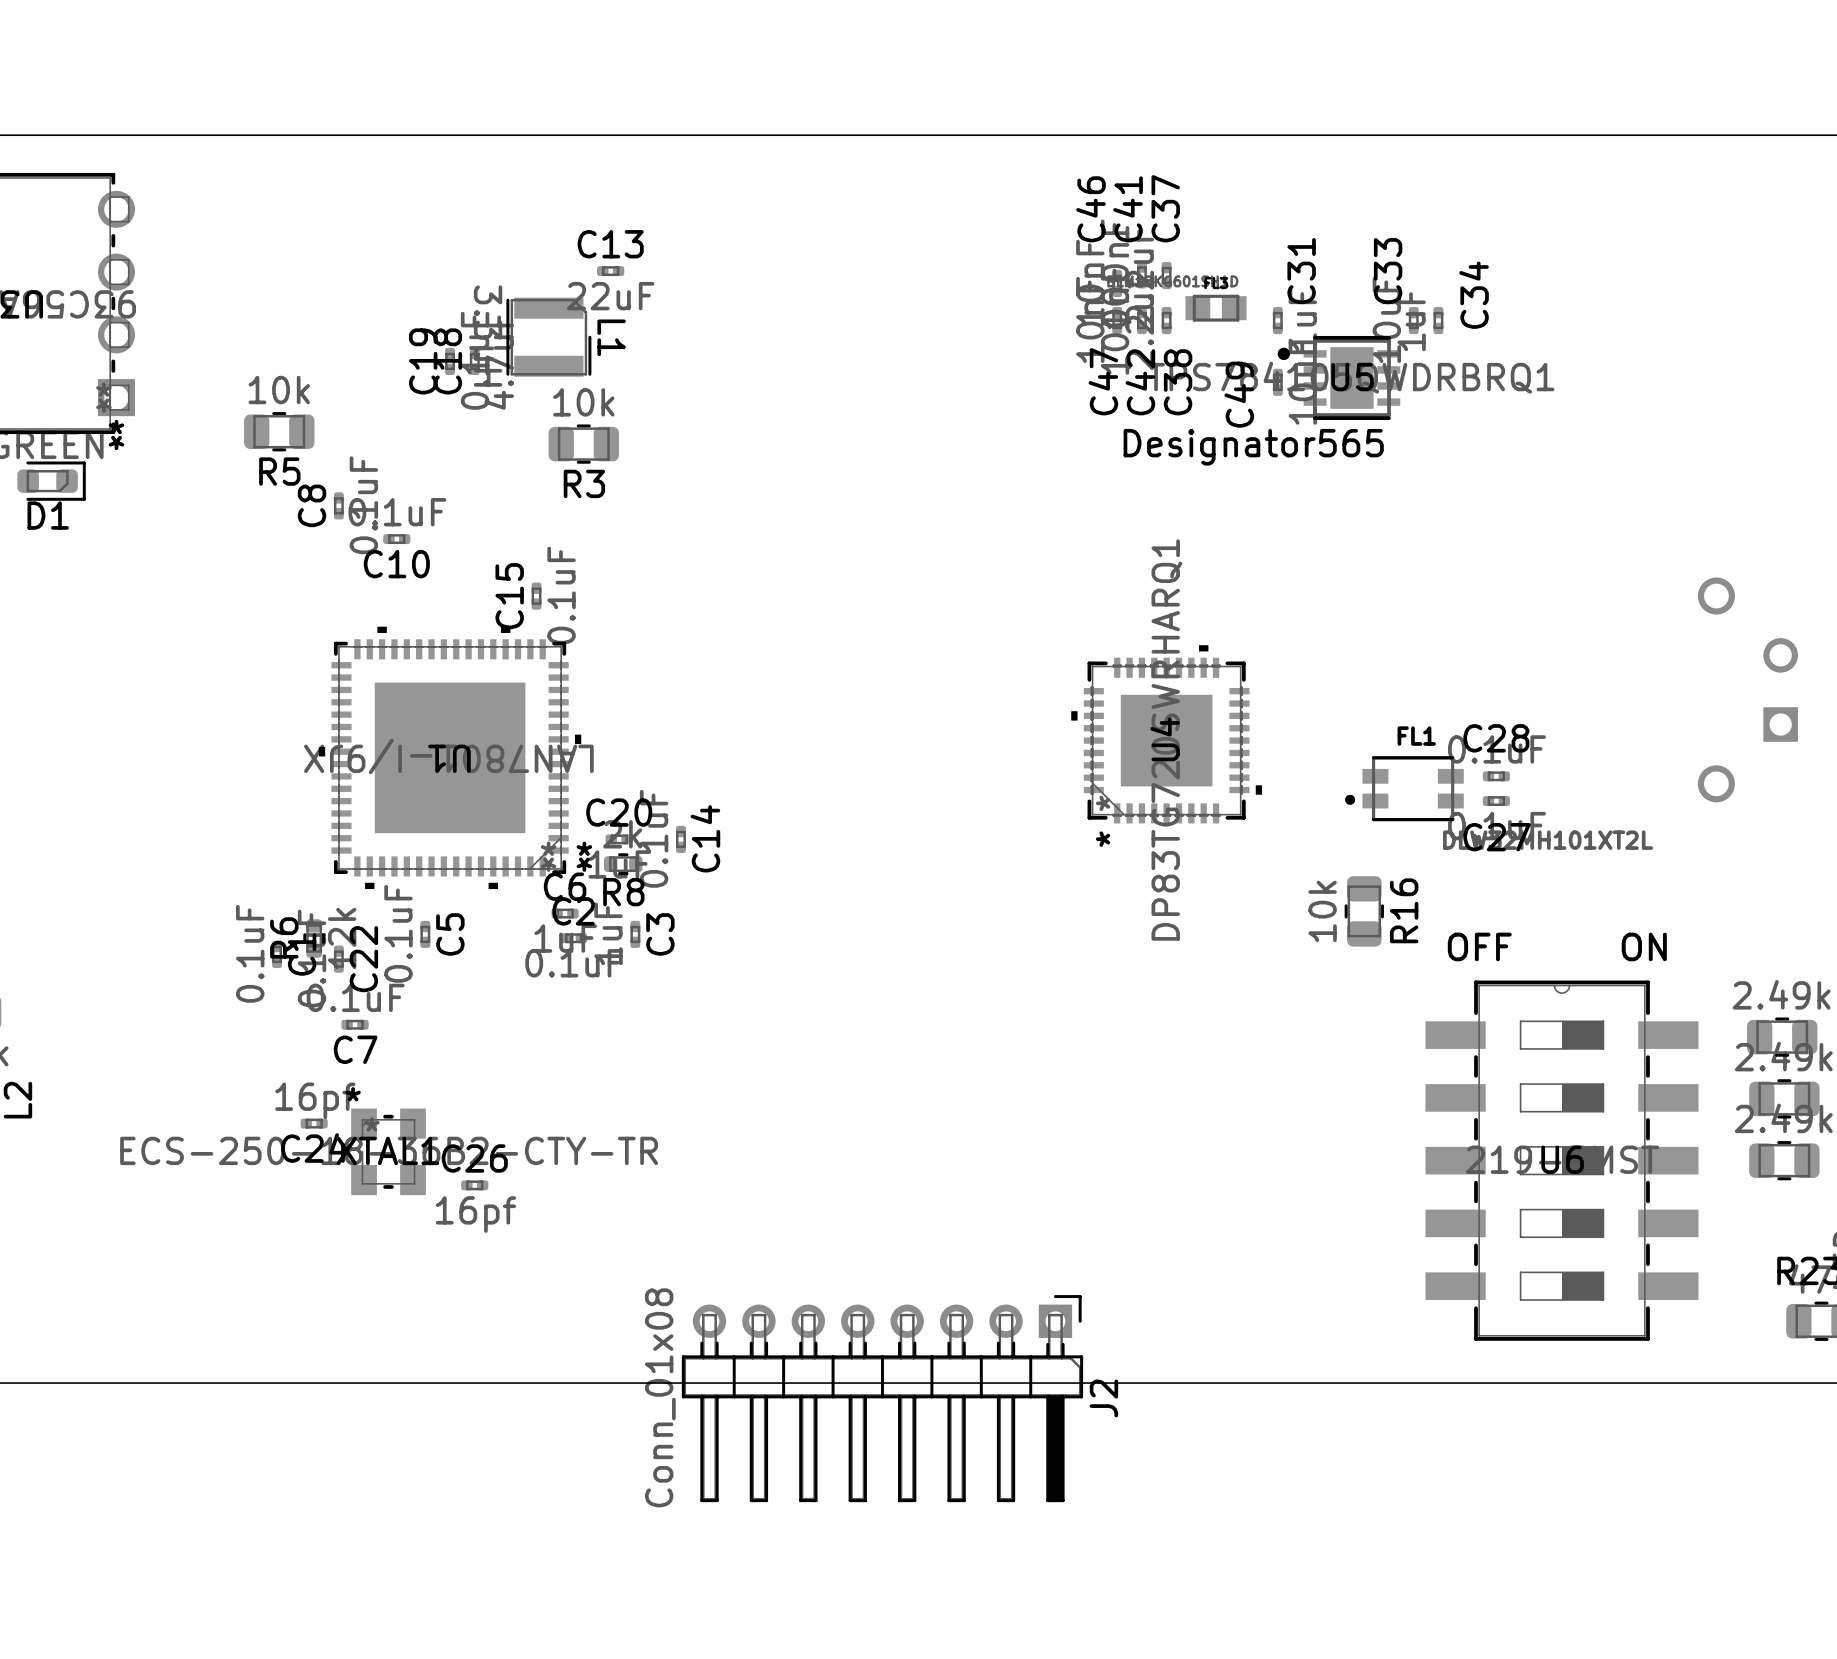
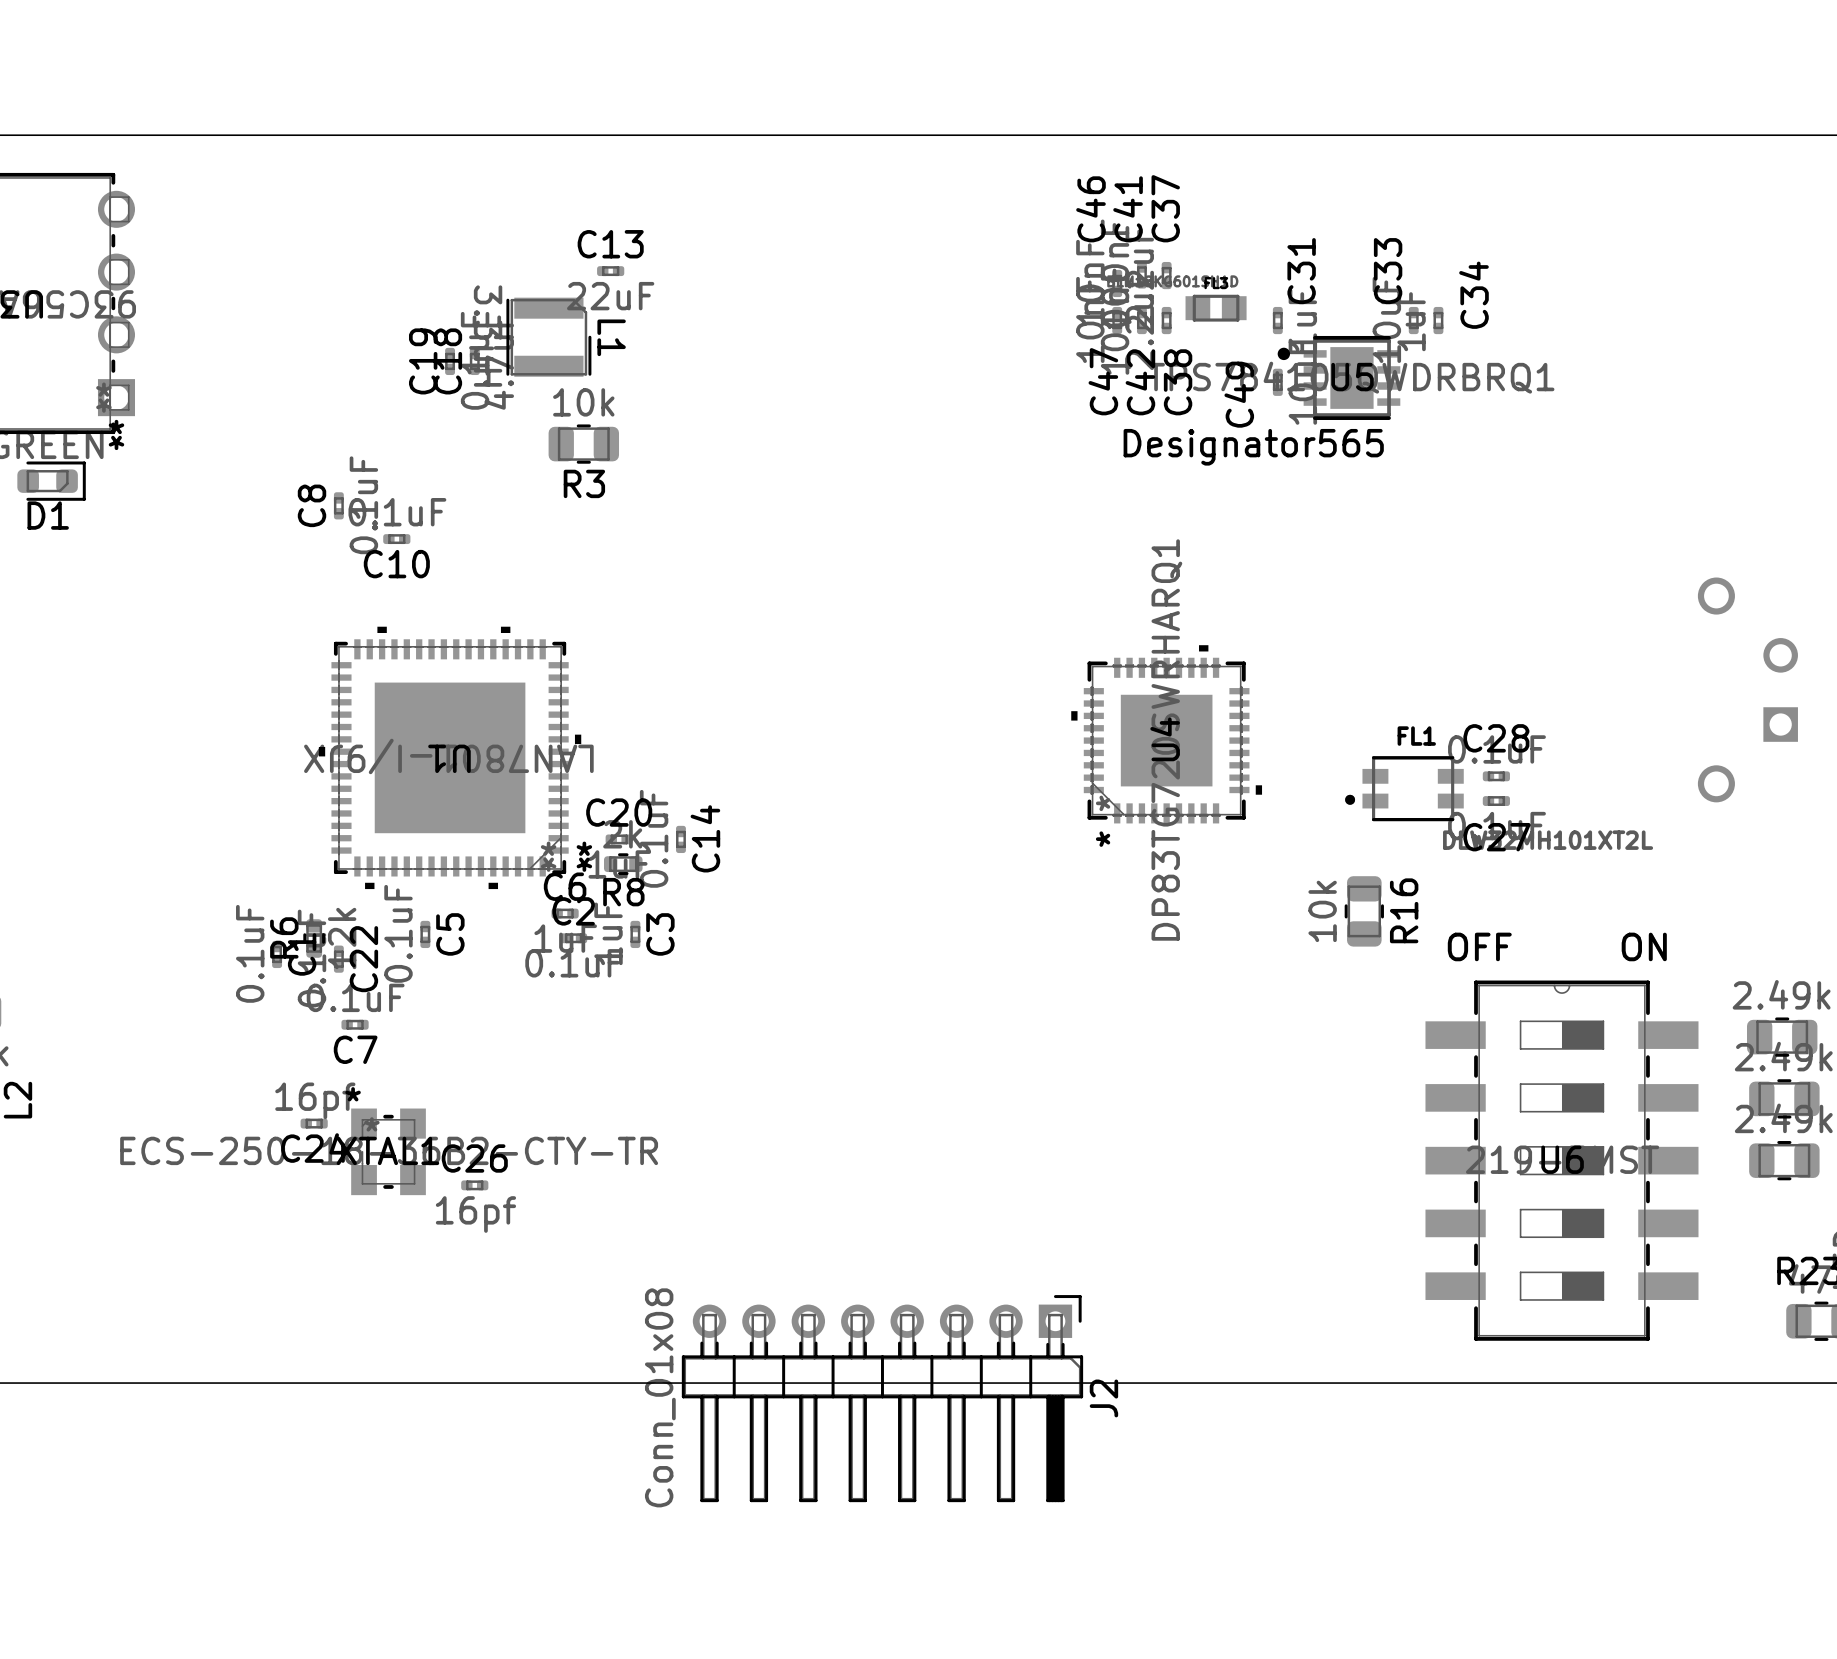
R5: 10k (279, 431) -> none
C15: 0.1uF (536, 596) -> none

